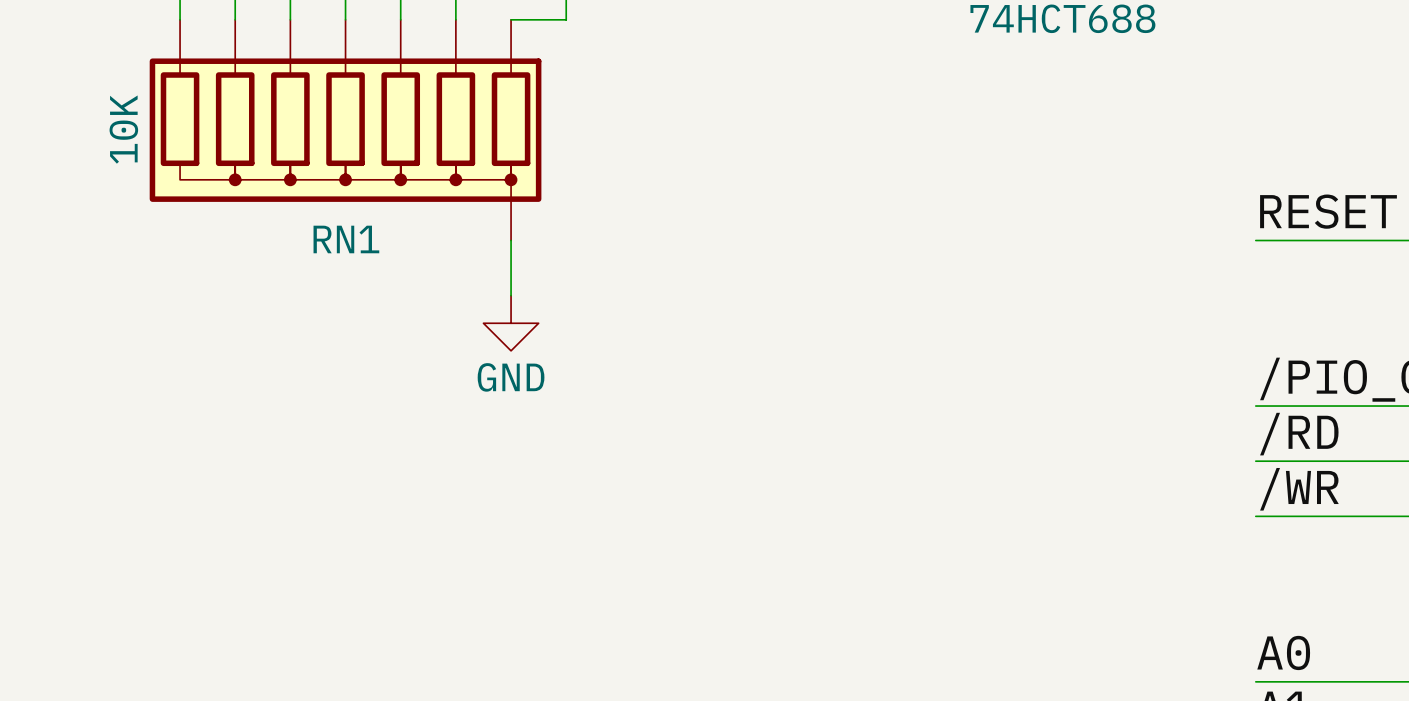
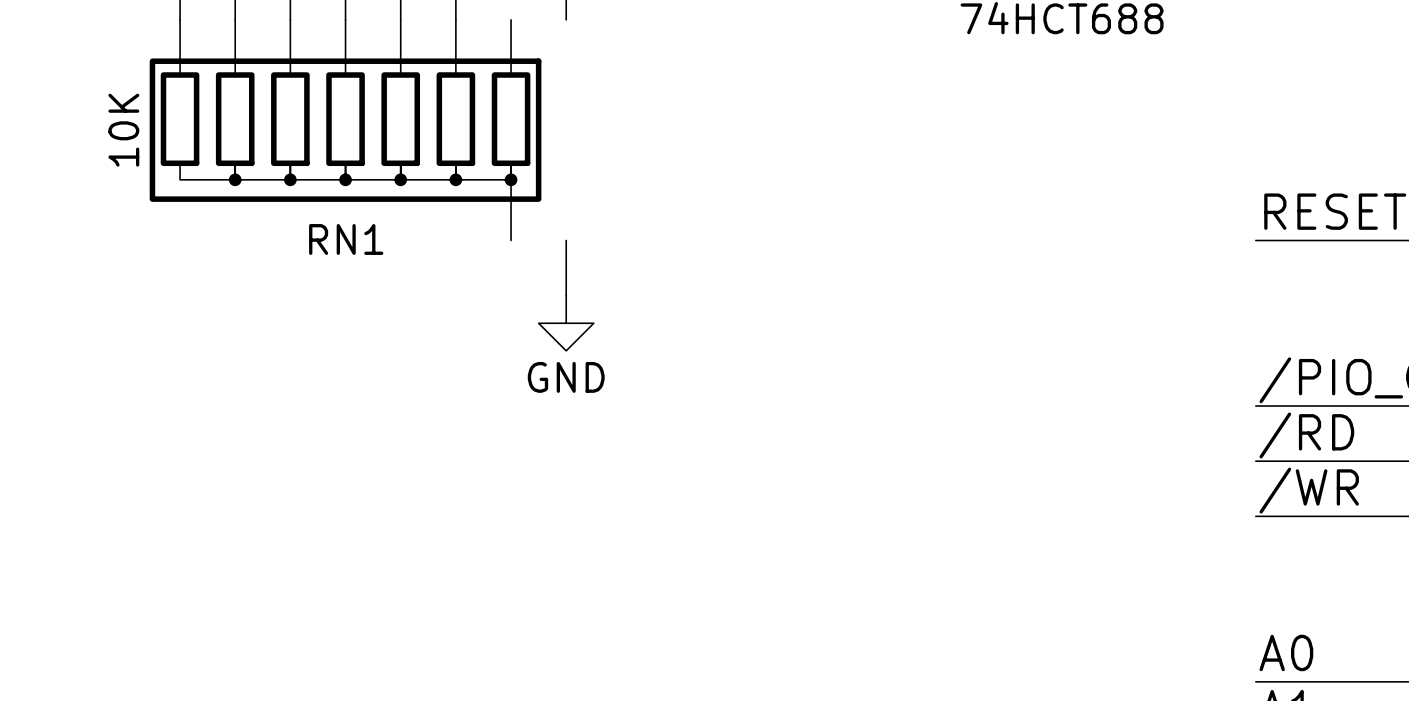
wire: (511, 19) (566, 19) -> none
wire: (511, 240) (511, 295) -> (566, 240) (566, 295)
power symbol position: GND (511, 323) -> GND (566, 323)

